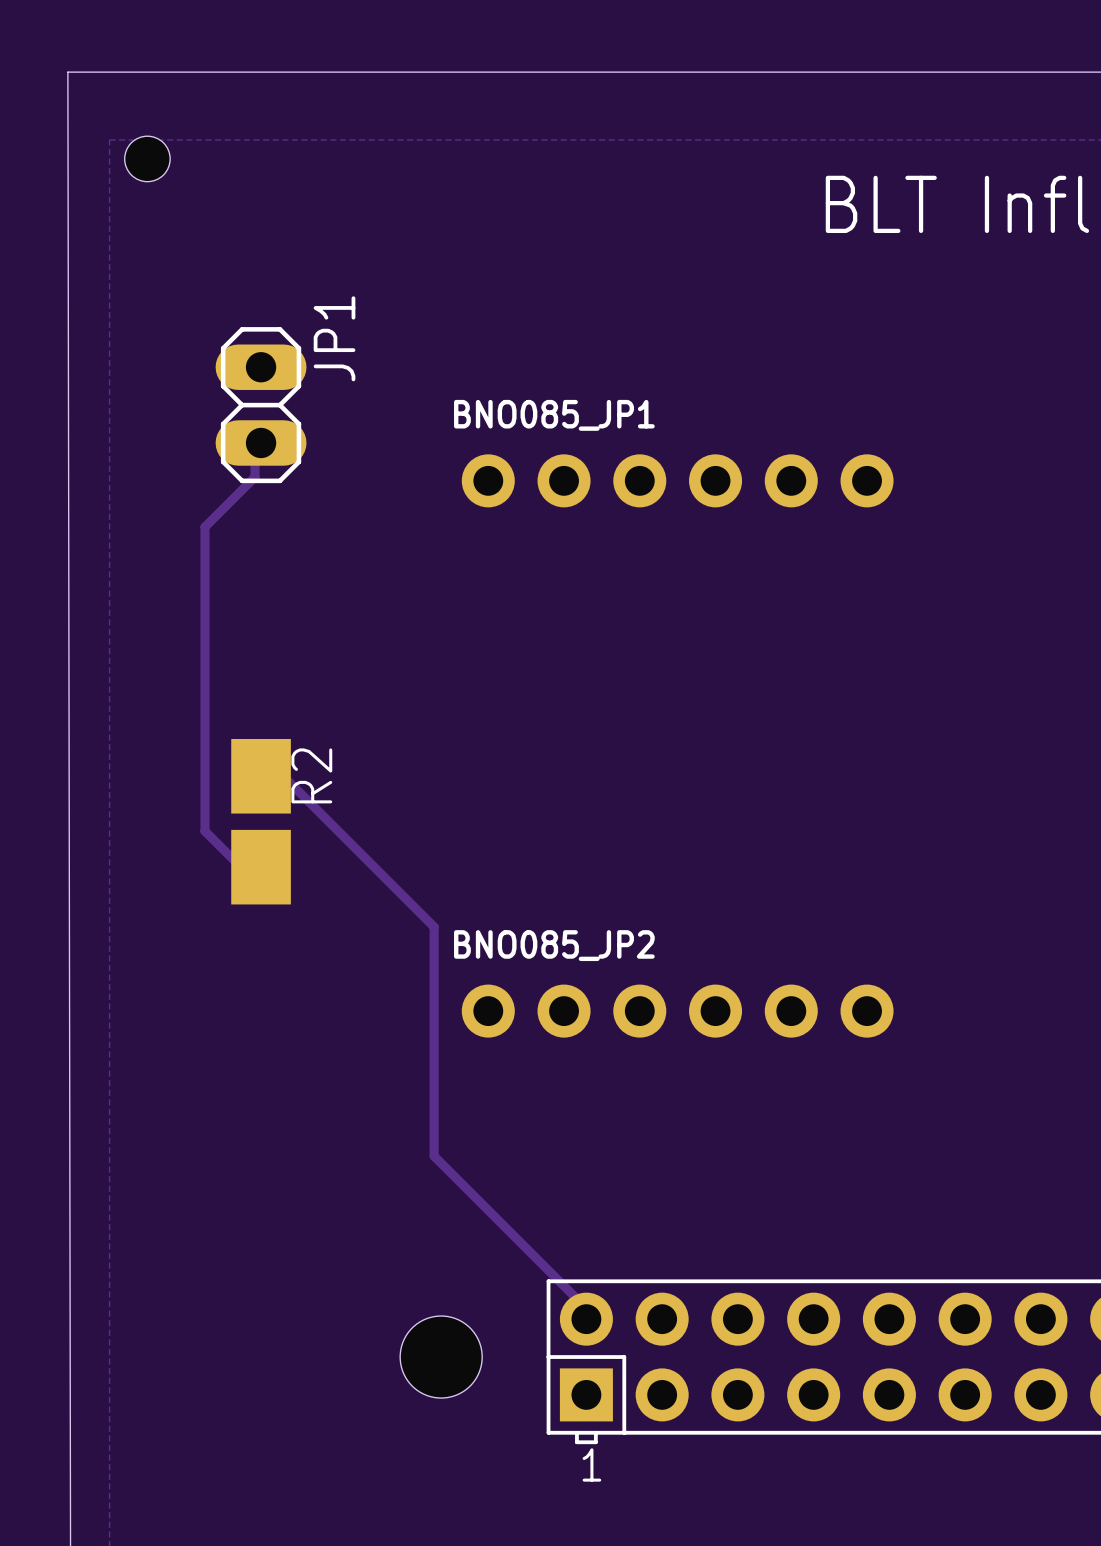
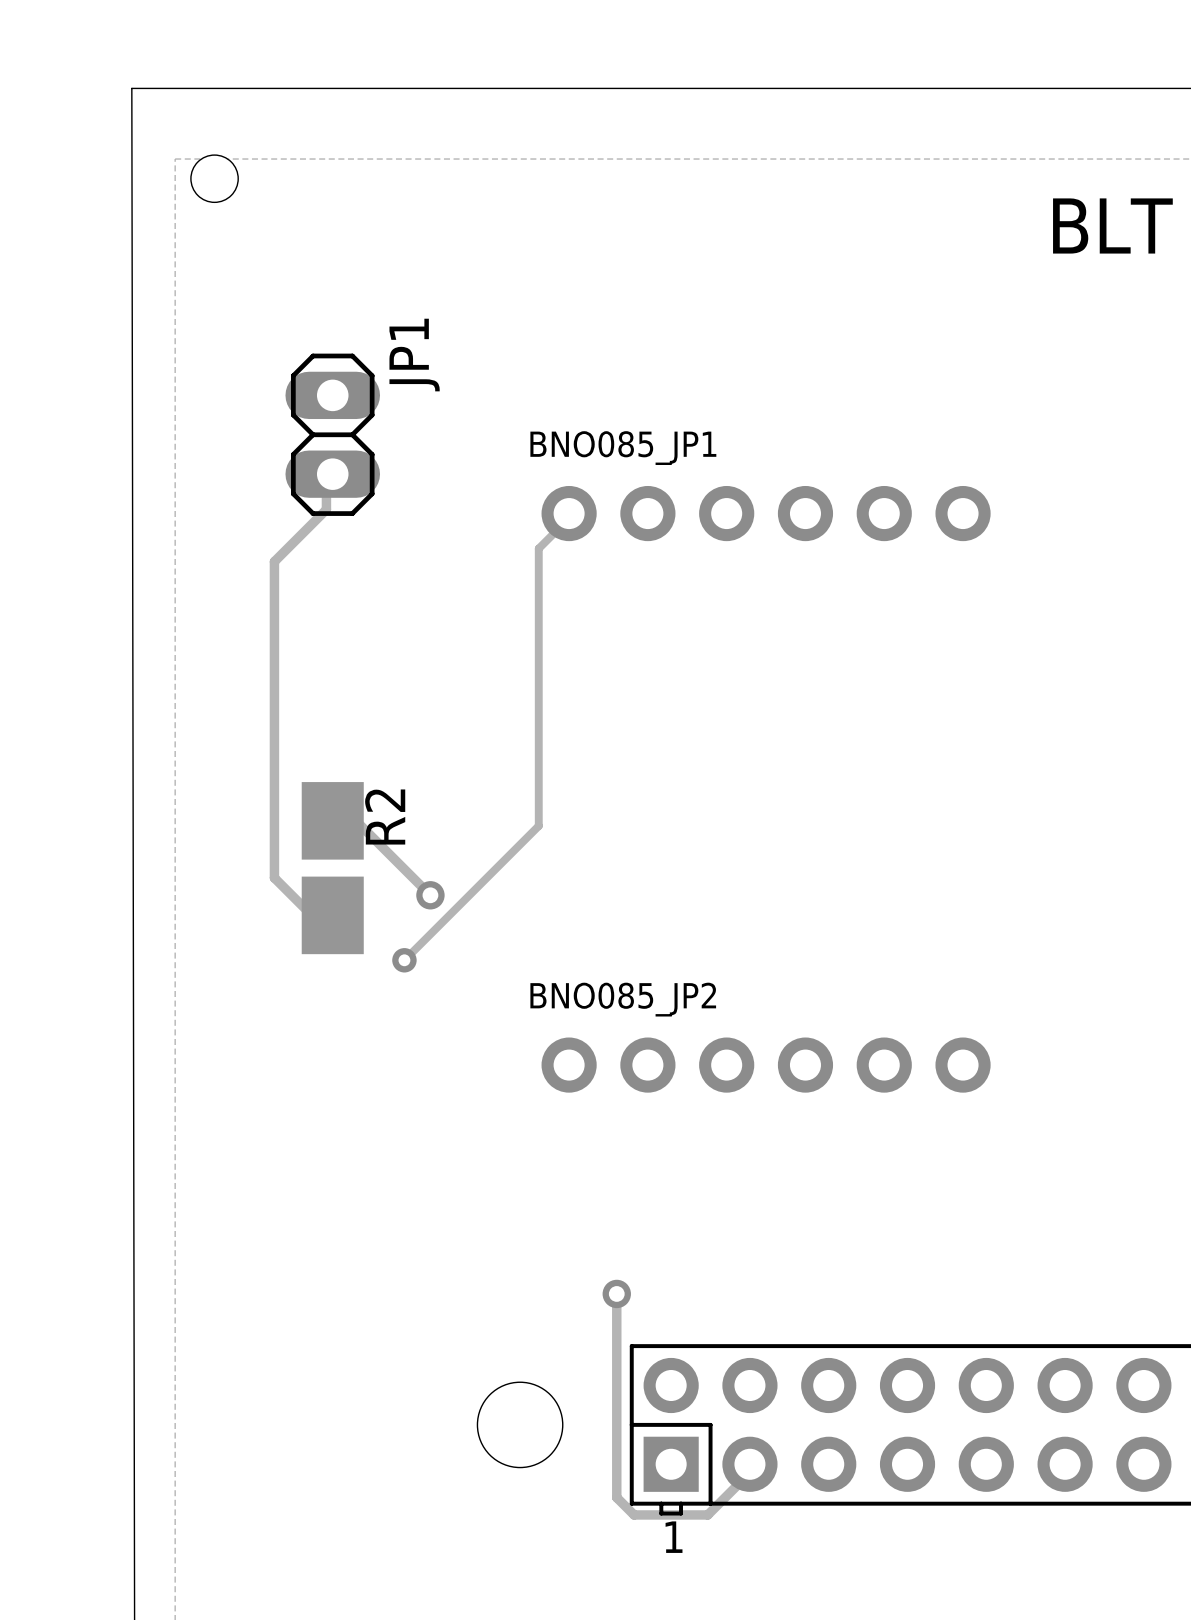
track: none -> (569, 513) (569, 518) (538, 548) (538, 825) (404, 960)
track: (354, 847) (434, 927) (434, 1156) (584, 1306) (584, 1318) (586, 1319) -> none
via: none -> (430, 895)
via: none -> (404, 960)
track: none -> (616, 1293) (616, 1497) (634, 1514) (707, 1514) (746, 1475) (746, 1467) (749, 1464)
via: none -> (616, 1293)

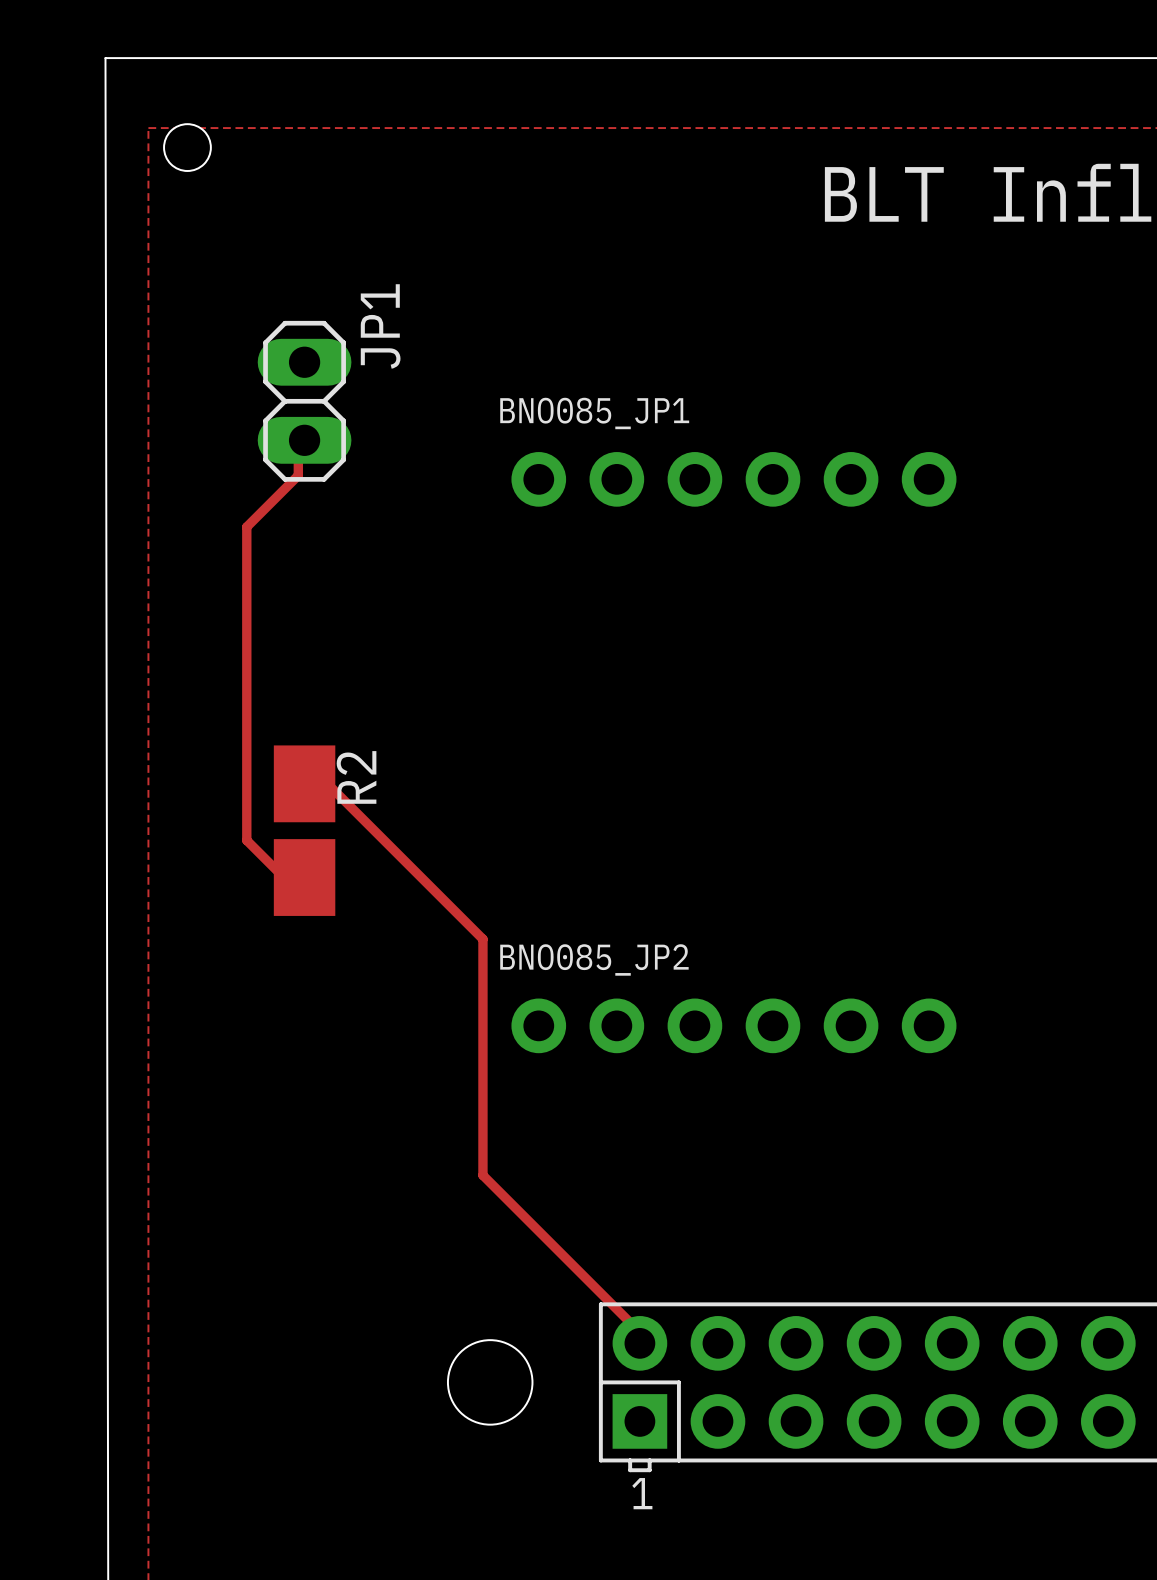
track: (569, 513) (569, 518) (538, 548) (538, 825) (404, 960) -> none
track: none -> (401, 857) (482, 939) (482, 1175) (637, 1329) (637, 1342) (639, 1343)
via: (430, 895) -> none
via: (404, 960) -> none
track: (616, 1293) (616, 1497) (634, 1514) (707, 1514) (746, 1475) (746, 1467) (749, 1464) -> none
via: (616, 1293) -> none

